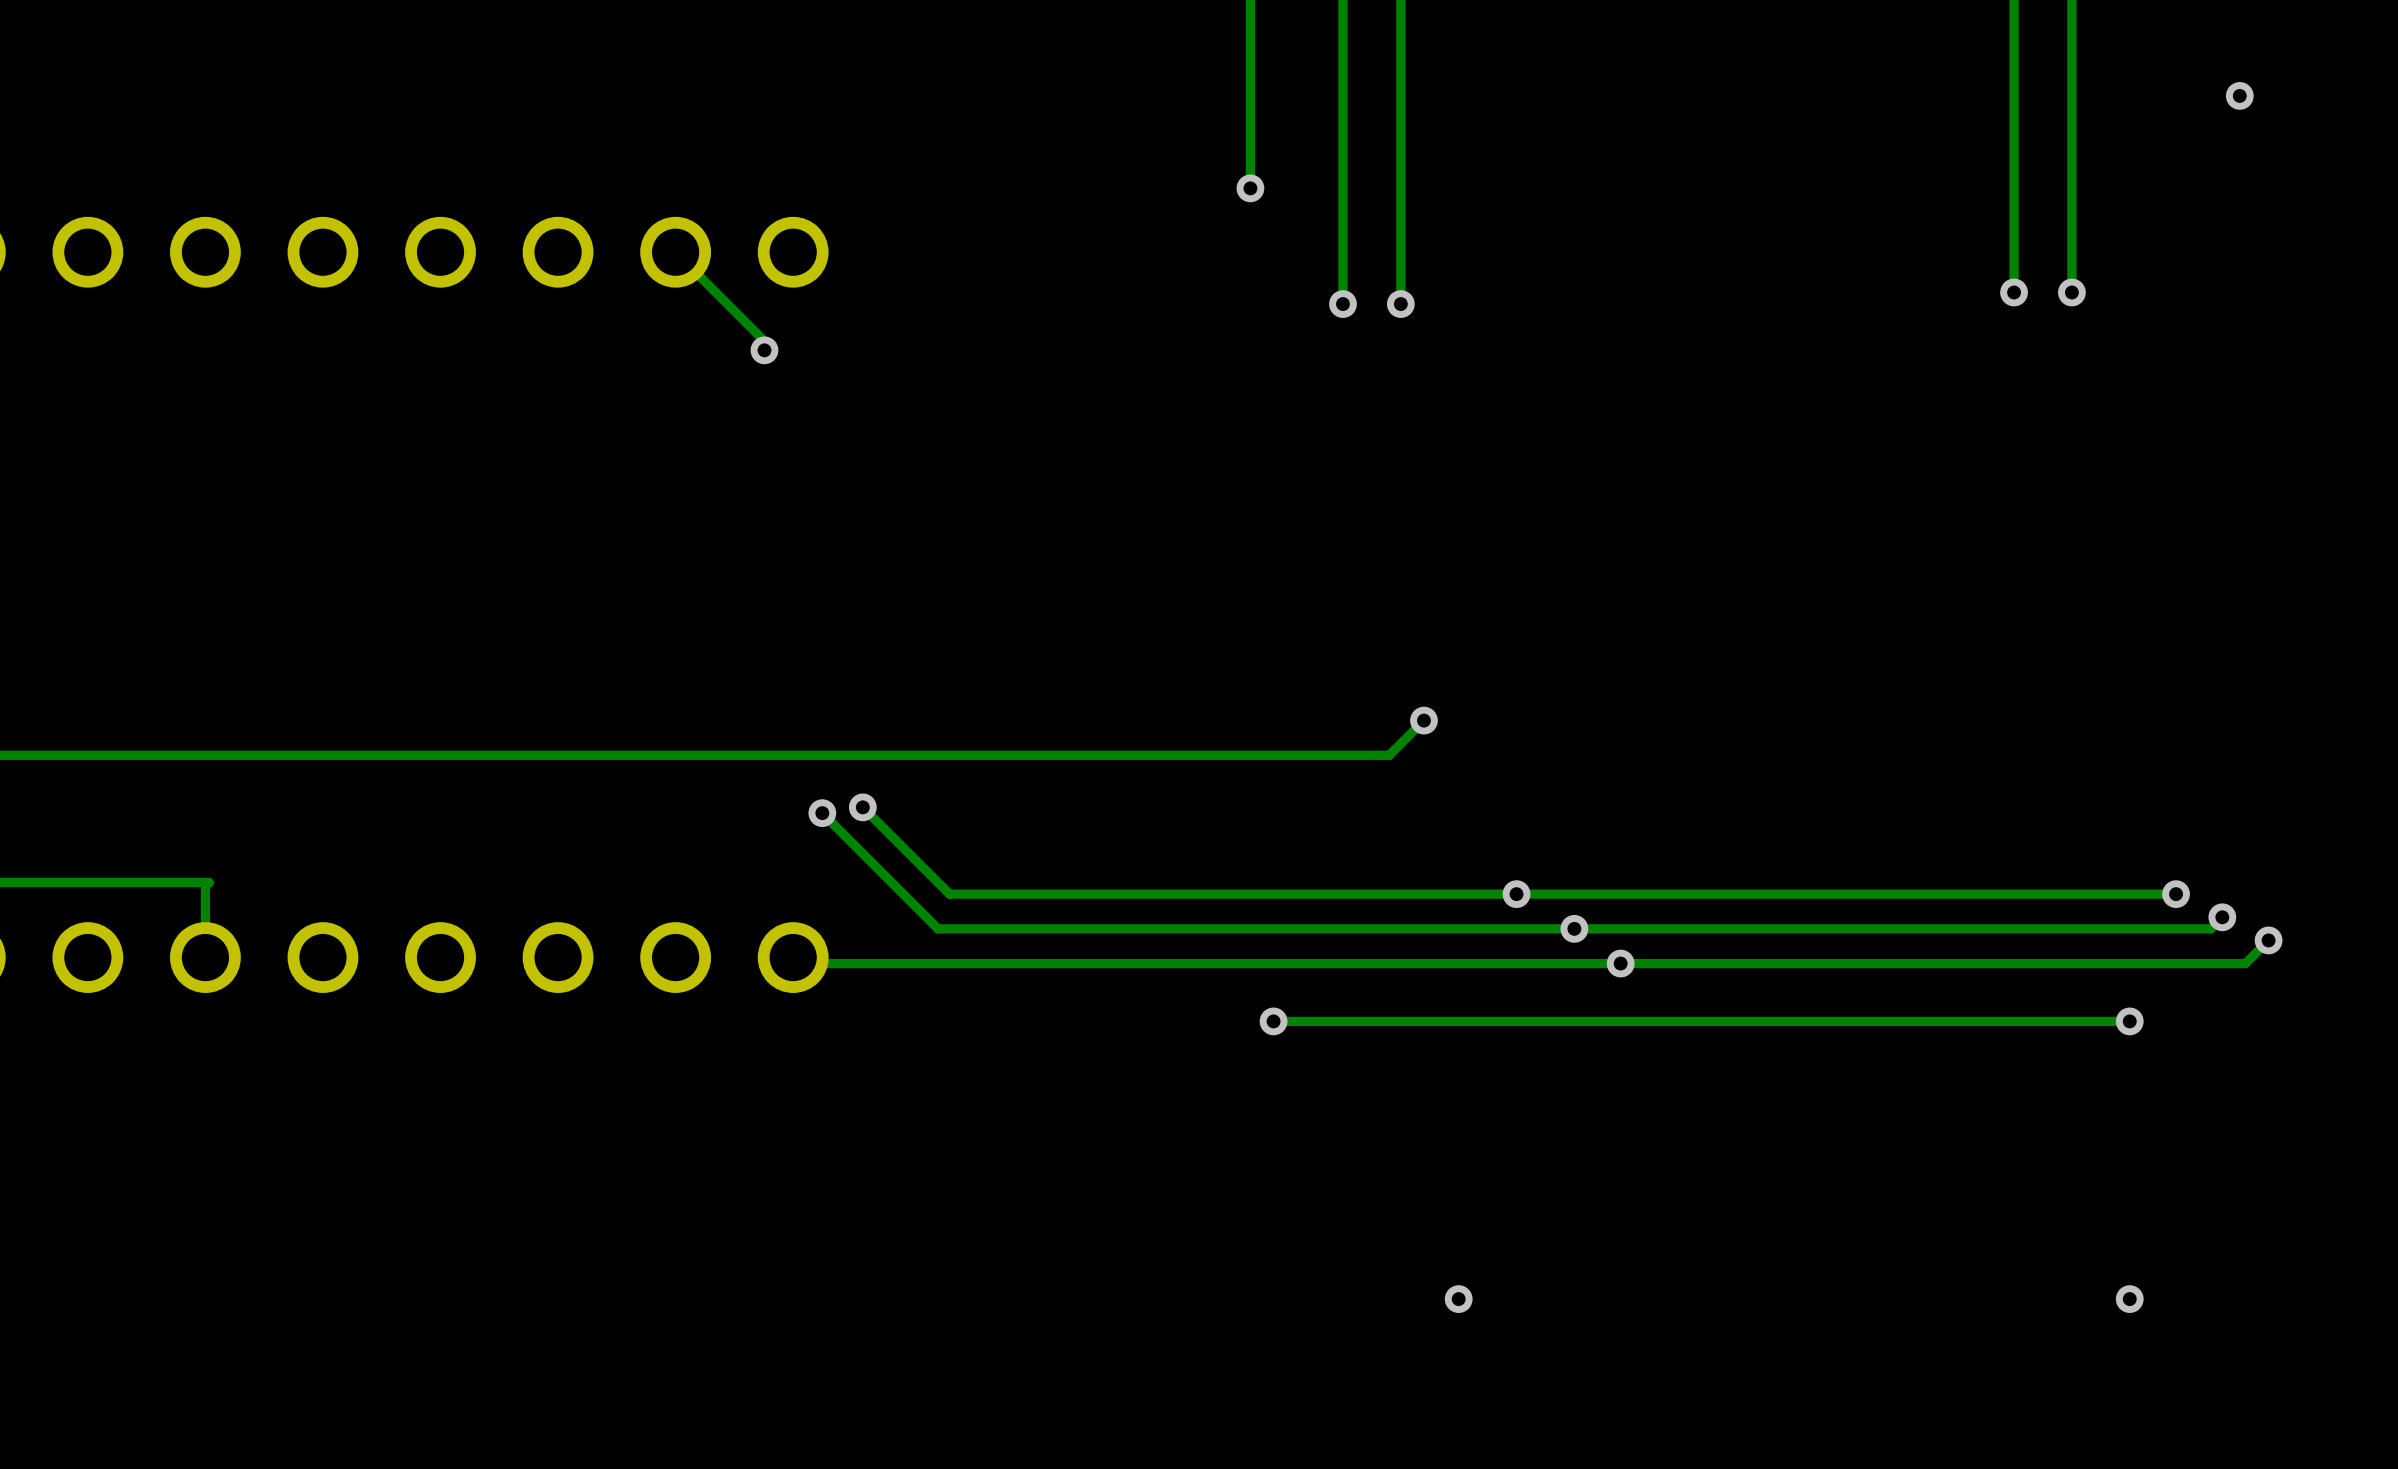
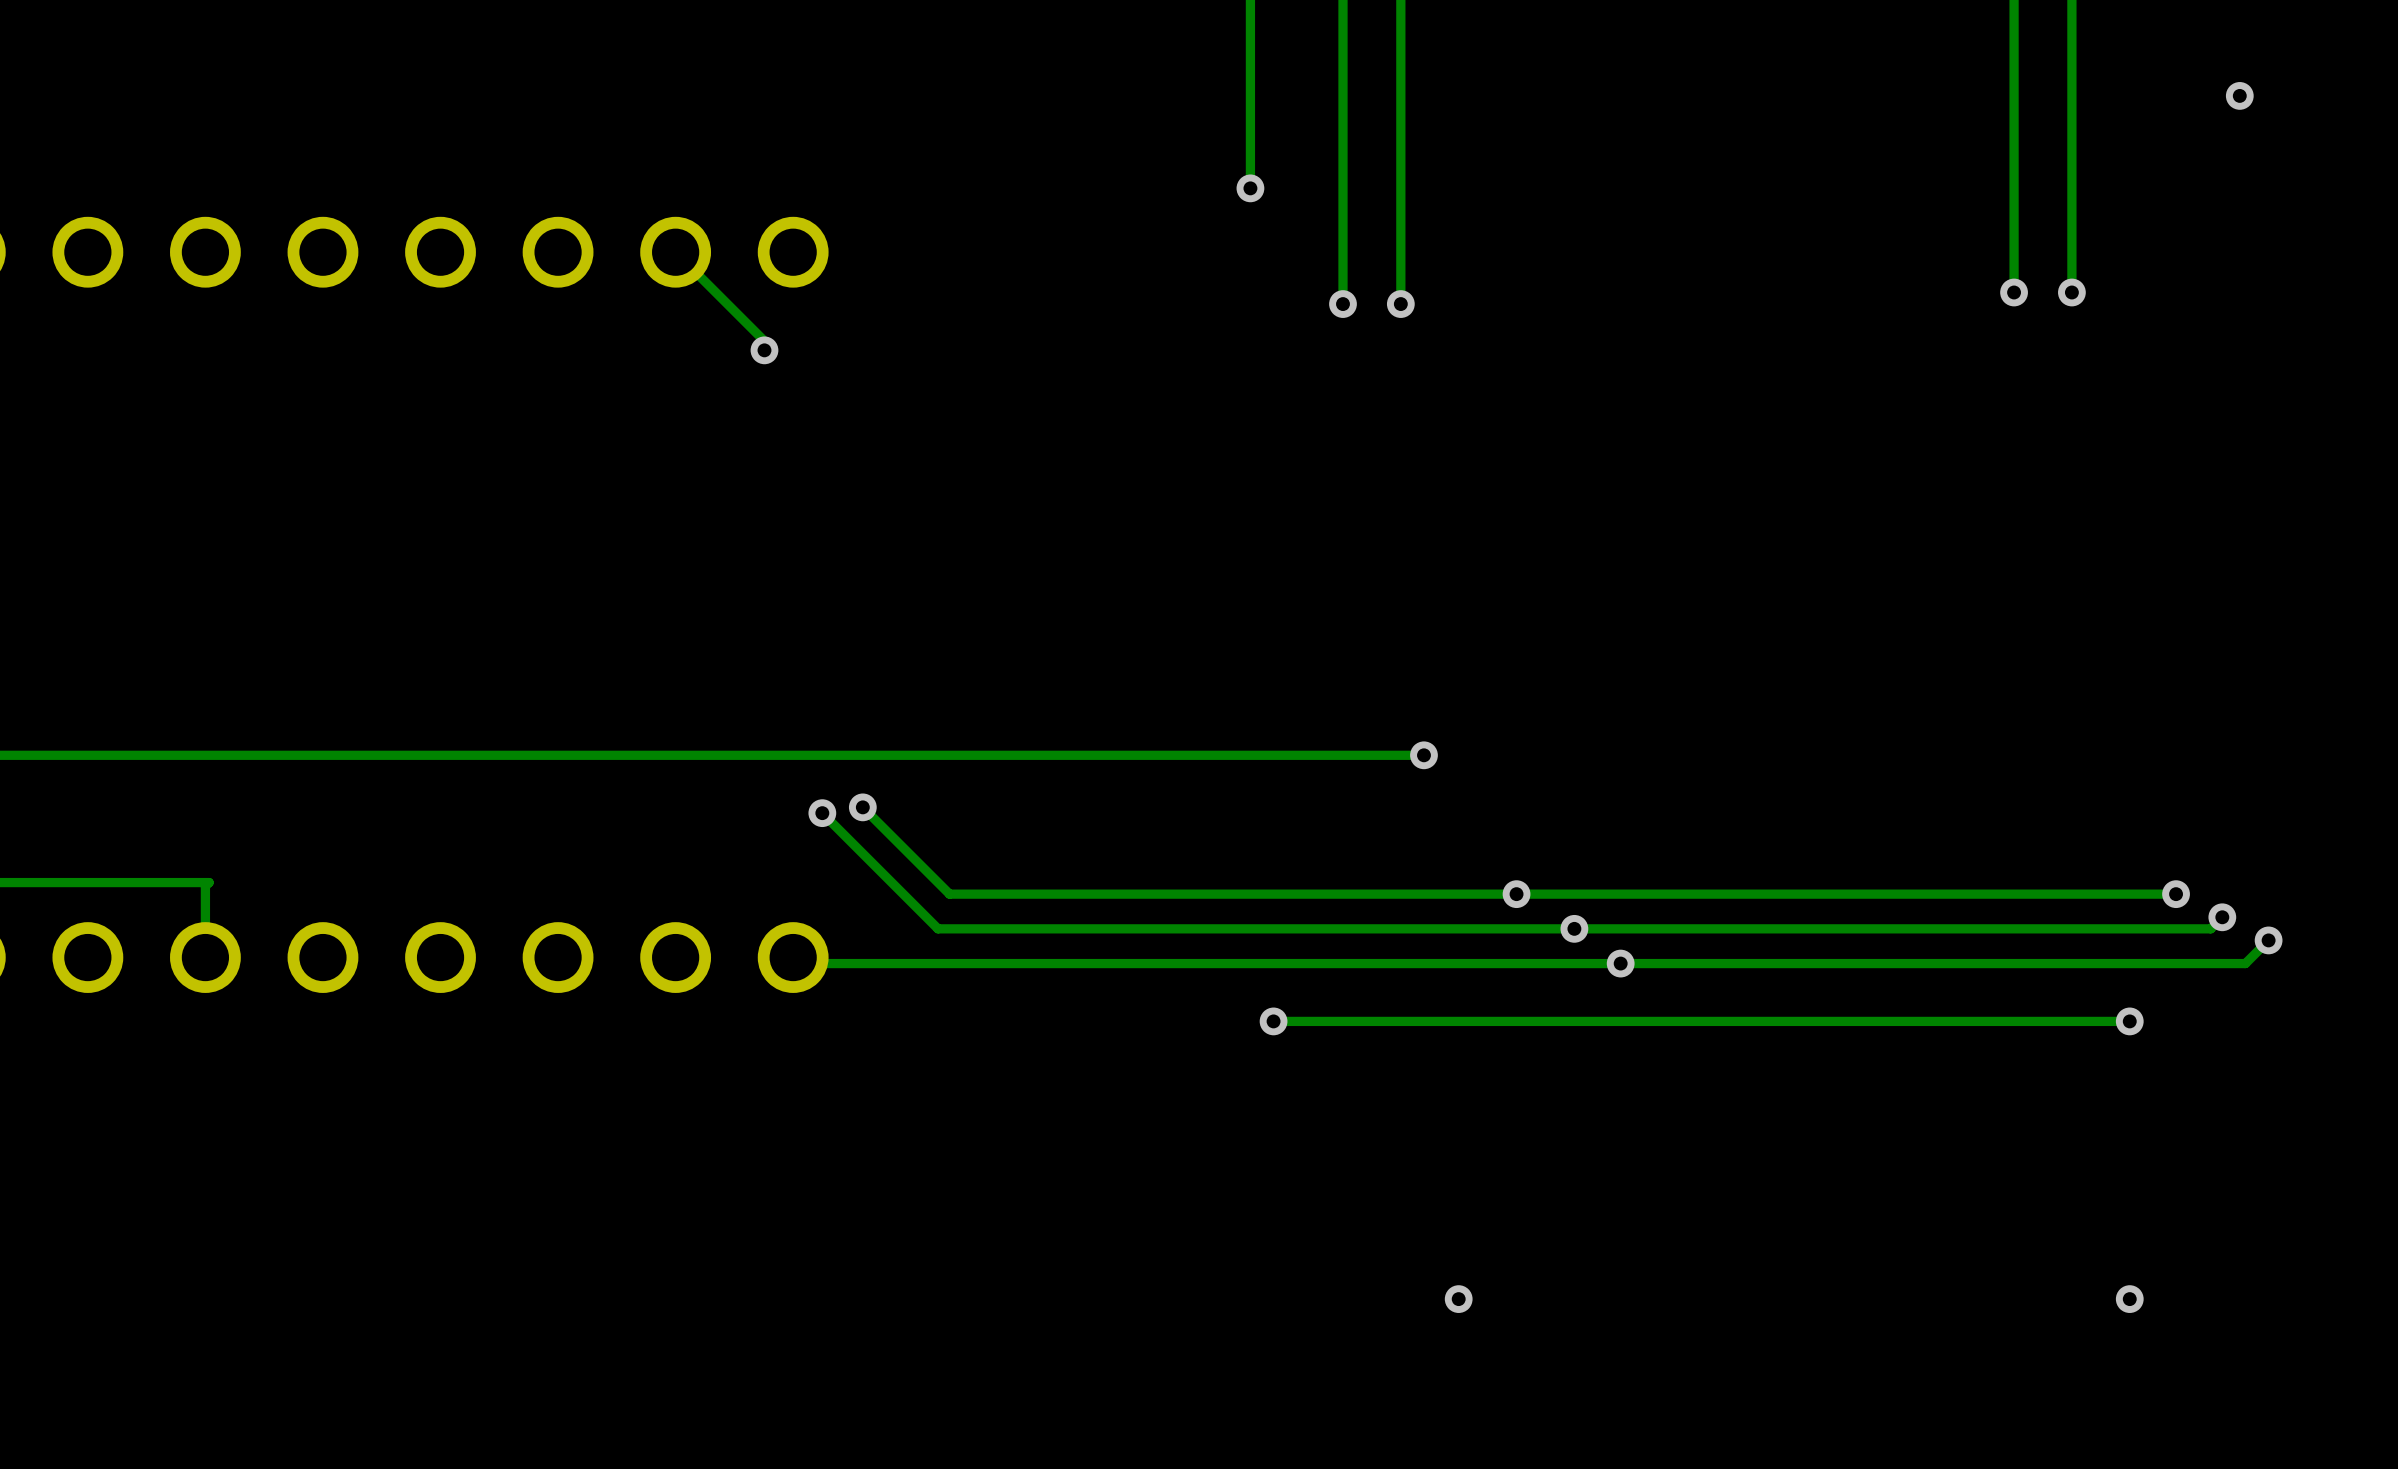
track: (1423, 720) (1389, 755) -> (1423, 755) (1389, 755)
via position: (1423, 720) -> (1423, 755)

